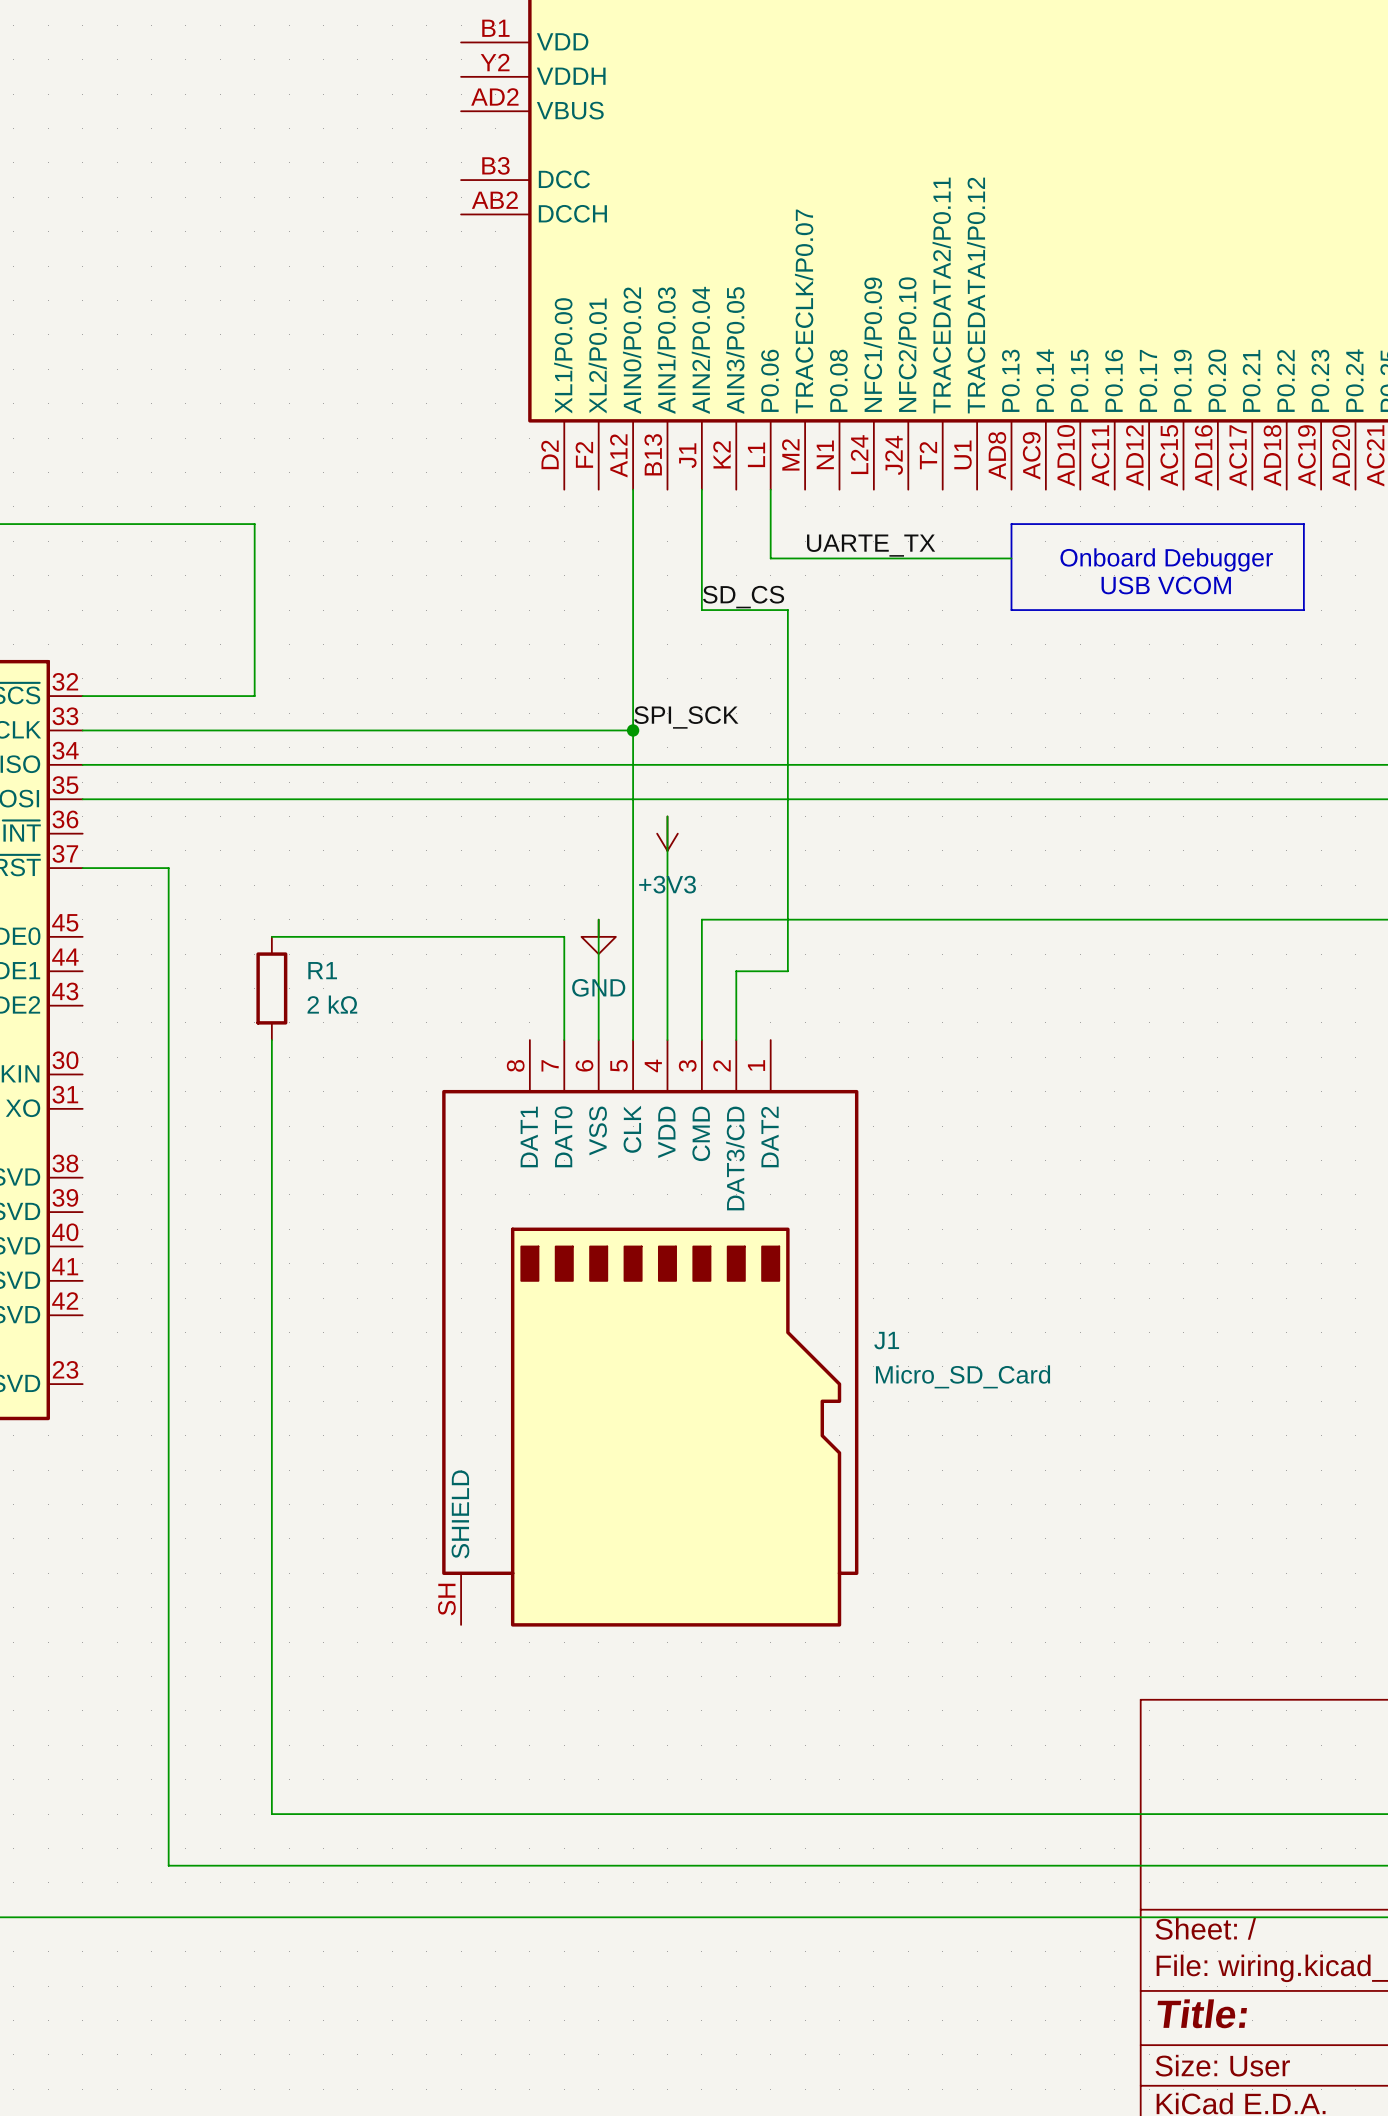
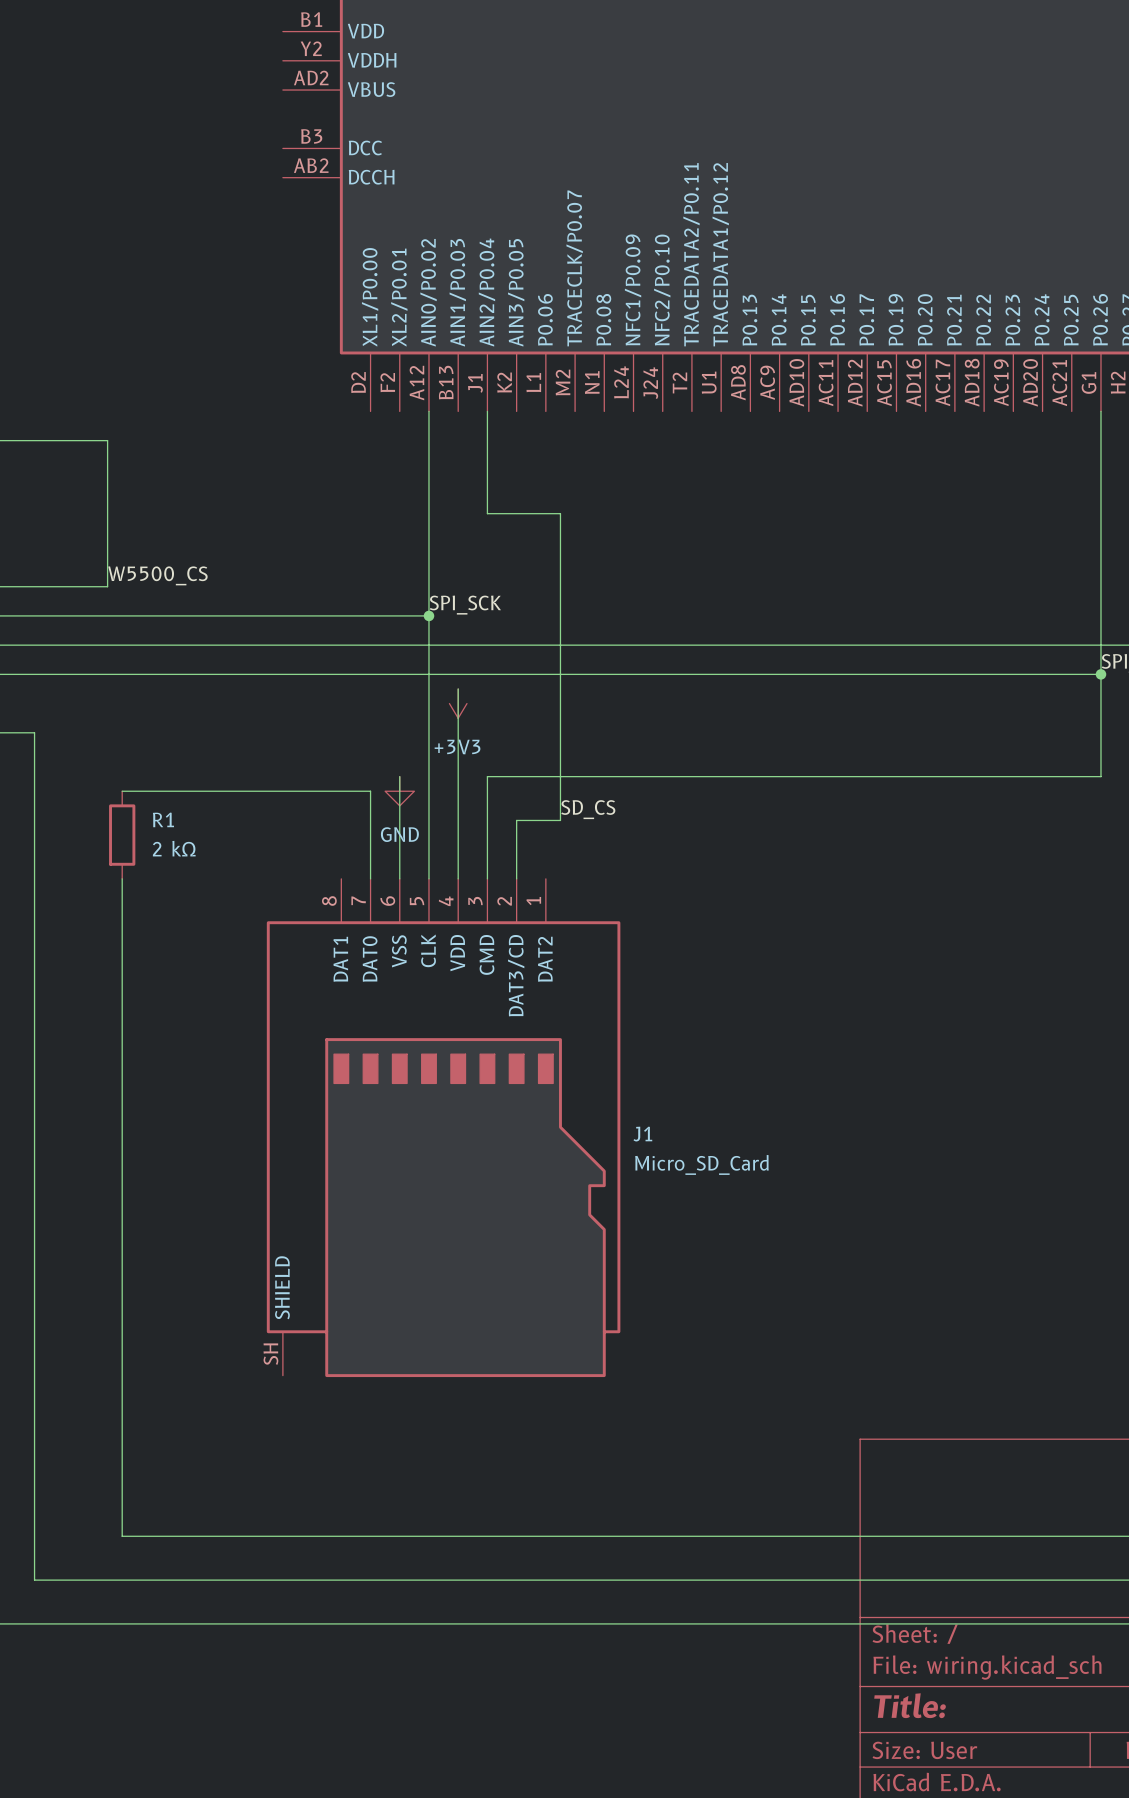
wire: (770, 489) (770, 558) (1011, 558) -> none
line: (1011, 524) (1303, 524) (1303, 610) (1011, 610) (1011, 524) -> none
label: UARTE_TX (871, 545) -> none
text: Onboard Debugger (1166, 559) -> none
text: USB VCOM (1166, 585) -> none
label: SD_CS (743, 597) -> none
label: none -> W5500_CS (157, 575)
label: none -> SD_CS (588, 809)

